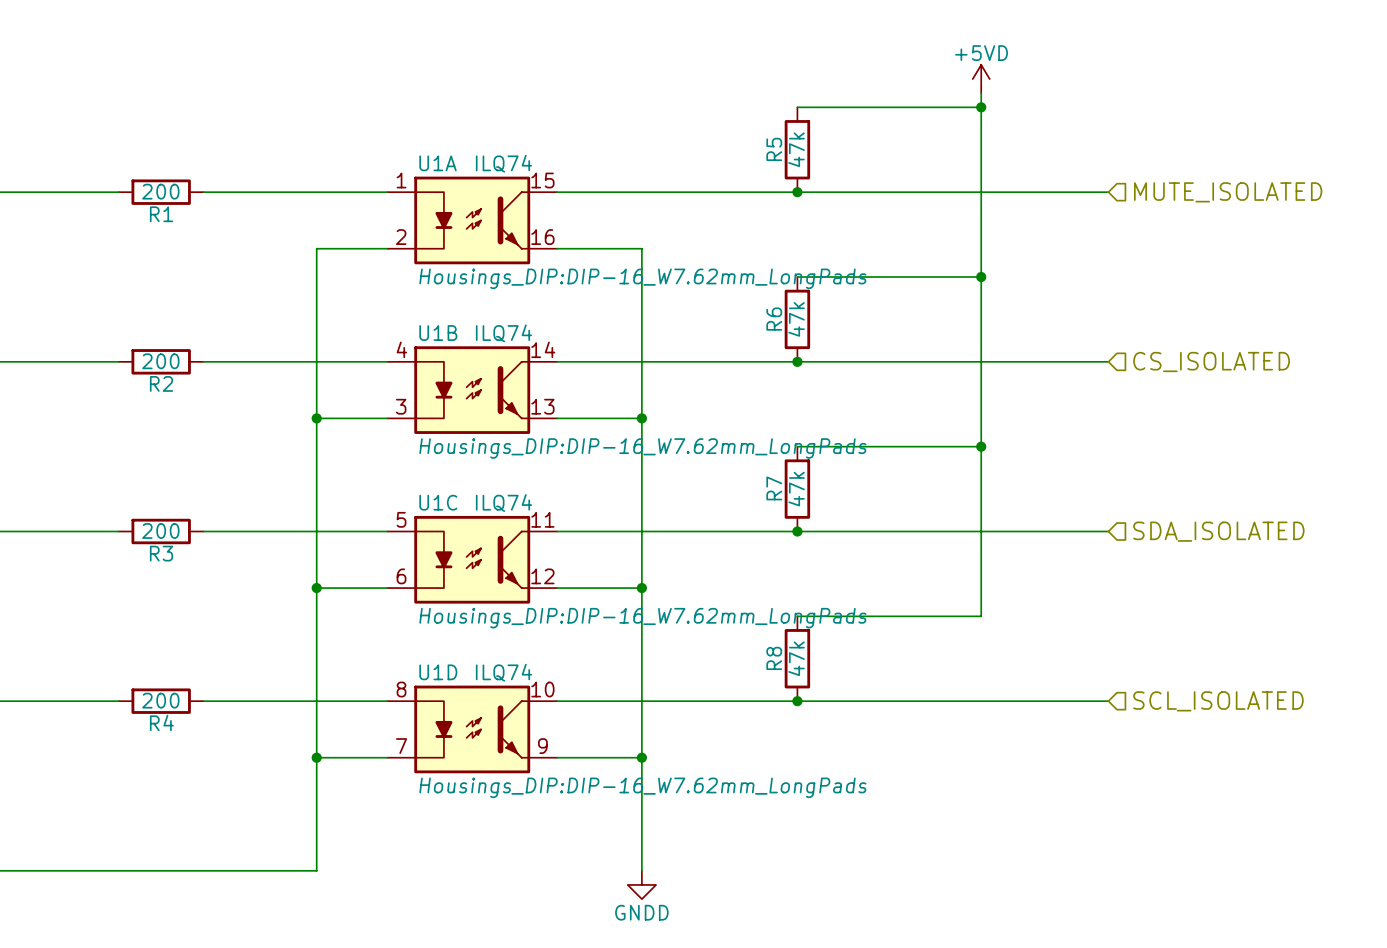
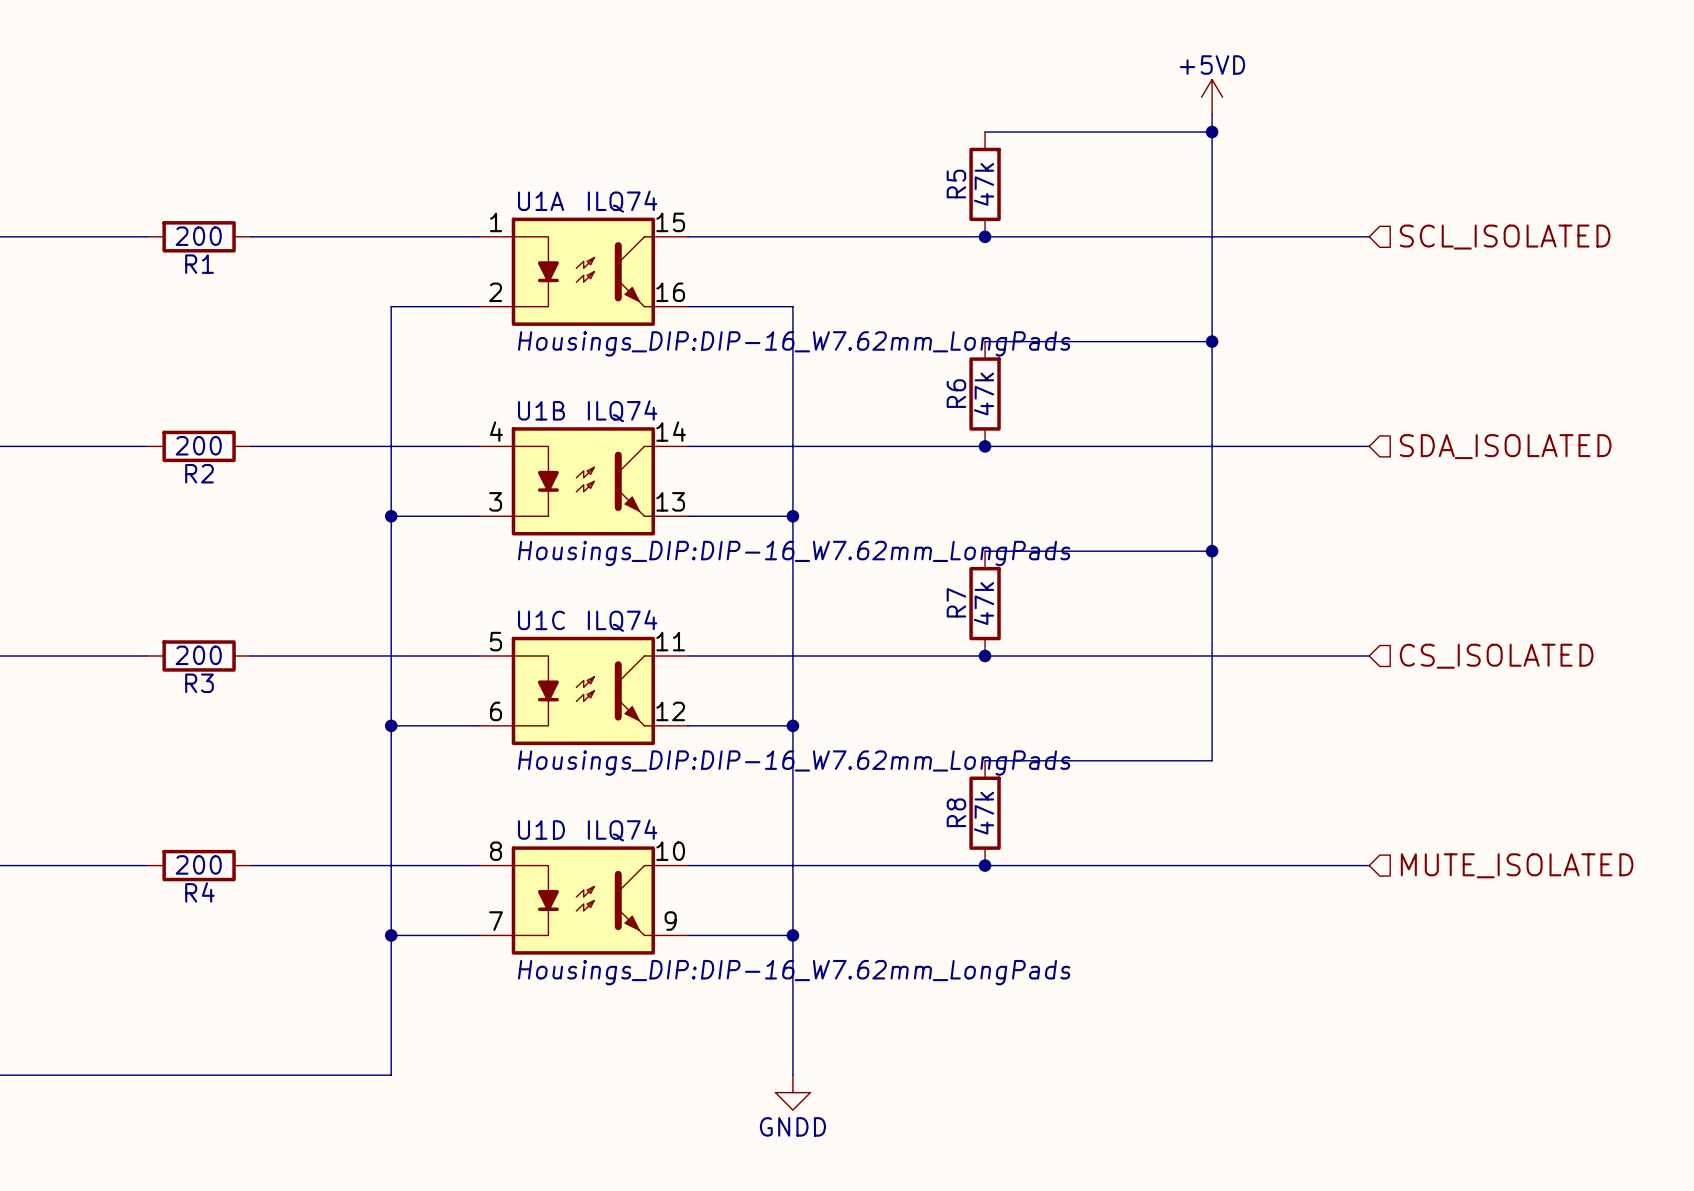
hierarchical label: MUTE_ISOLATED (1228, 192) -> SCL_ISOLATED (1505, 237)
hierarchical label: CS_ISOLATED (1211, 362) -> SDA_ISOLATED (1505, 446)
hierarchical label: SDA_ISOLATED (1218, 531) -> CS_ISOLATED (1496, 656)
hierarchical label: SCL_ISOLATED (1218, 701) -> MUTE_ISOLATED (1517, 865)

